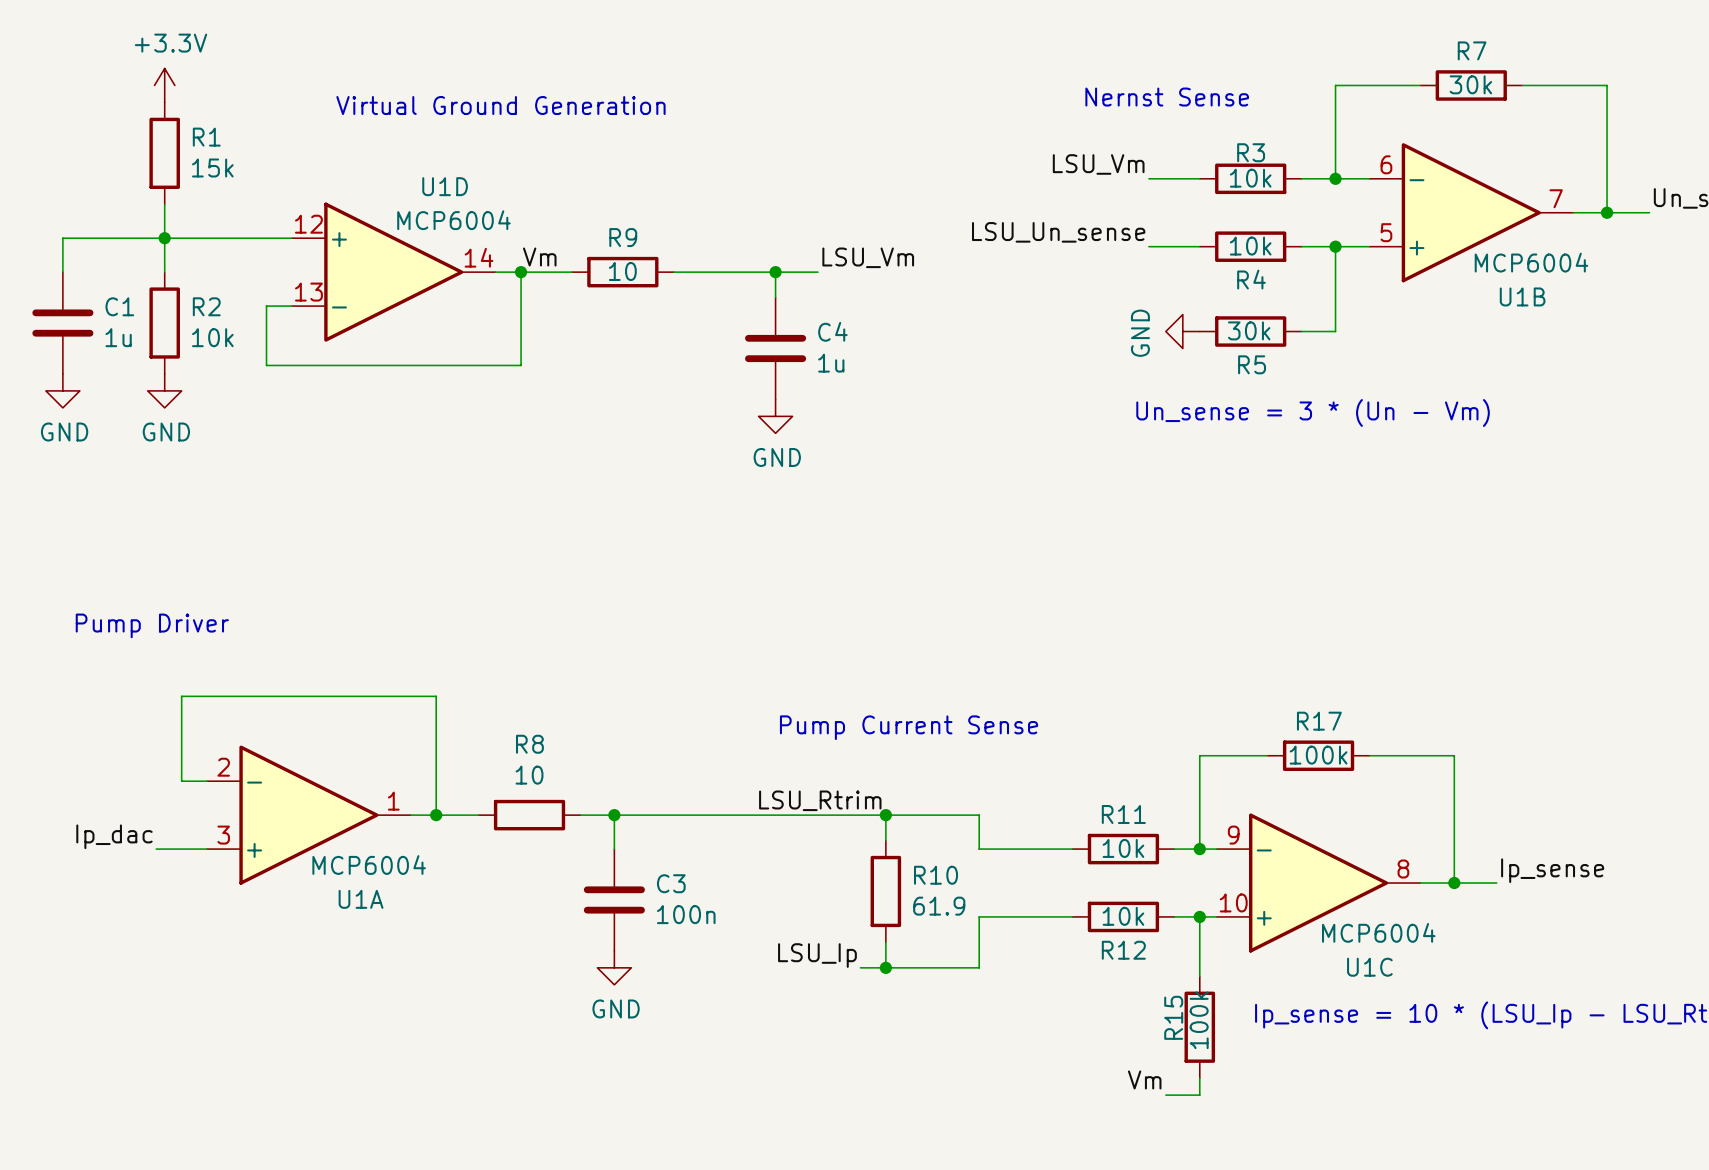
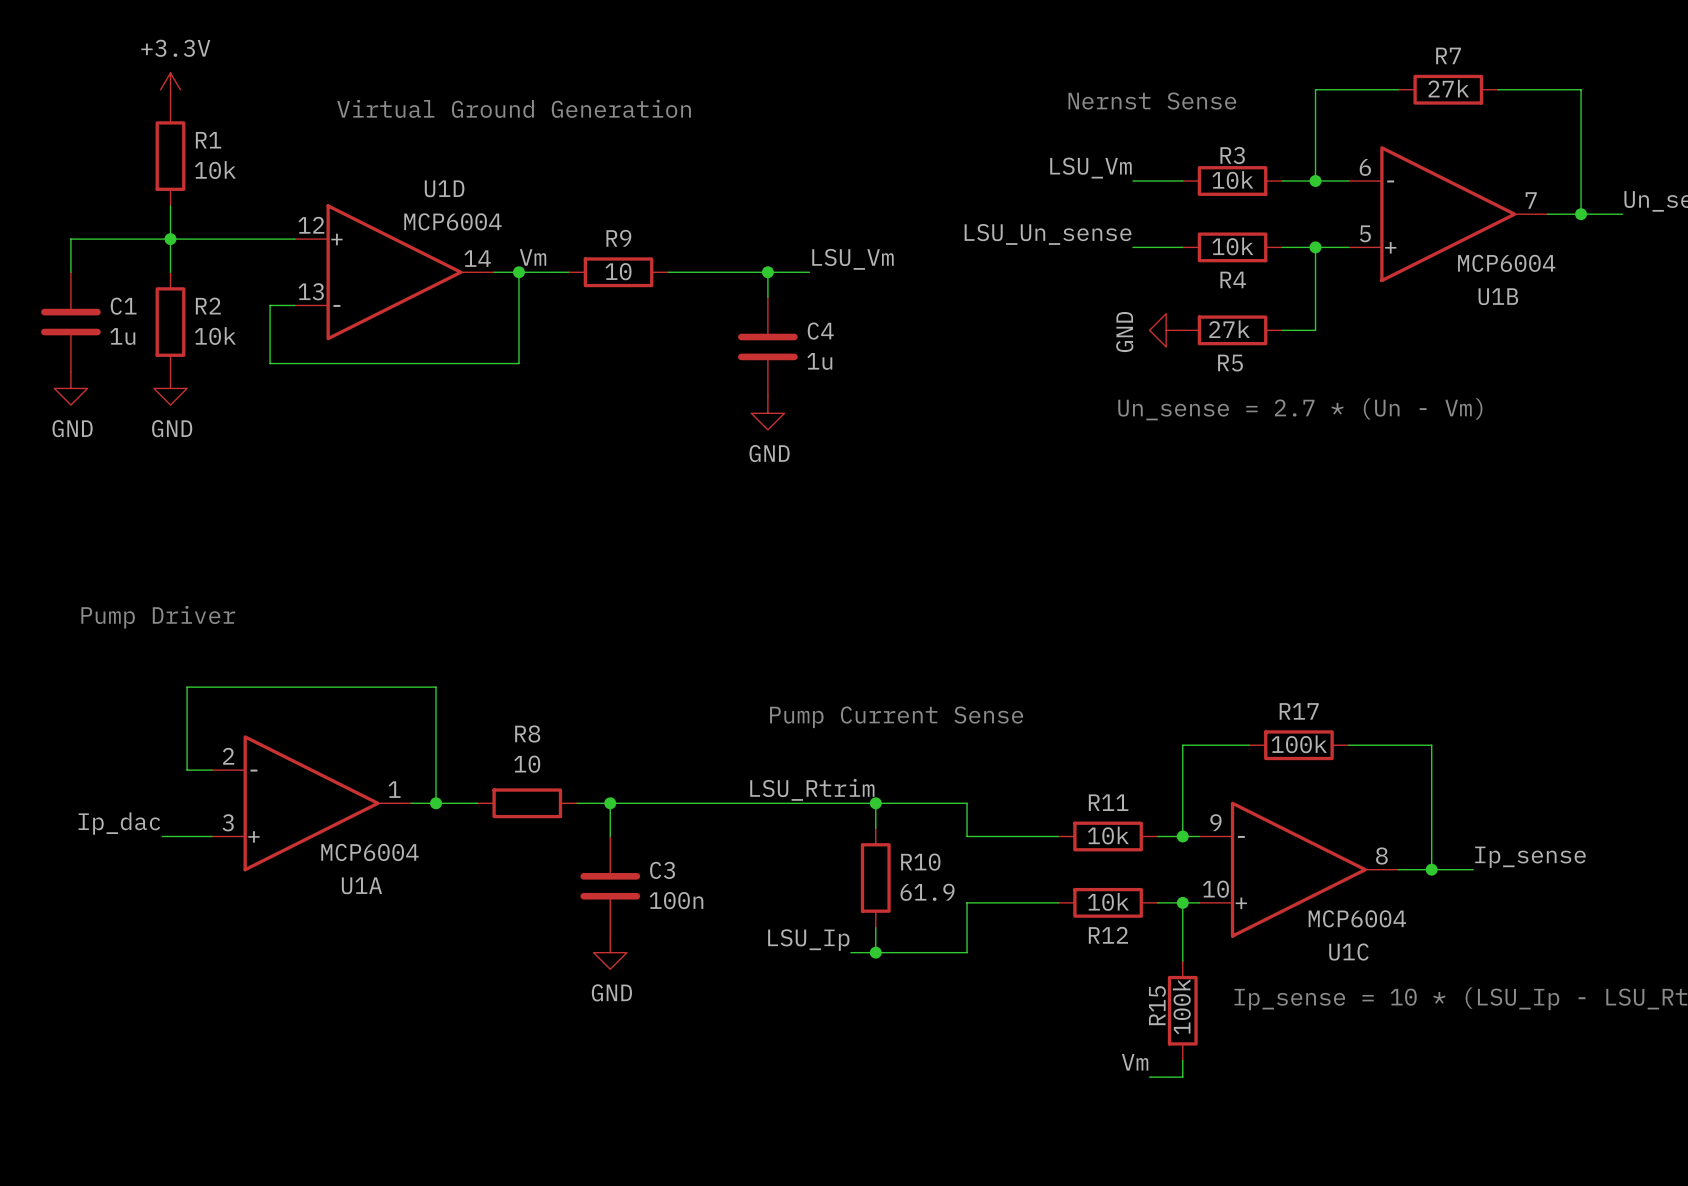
R7 value: 30k (1470, 84) -> 27k (1448, 88)
R1 value: 15k (212, 167) -> 10k (215, 170)
R5 value: 30k (1249, 330) -> 27k (1229, 329)
text: Un_sense = 3 * (Un - Vm) (1313, 412) -> Un_sense = 2.7 * (Un - Vm) (1300, 409)

